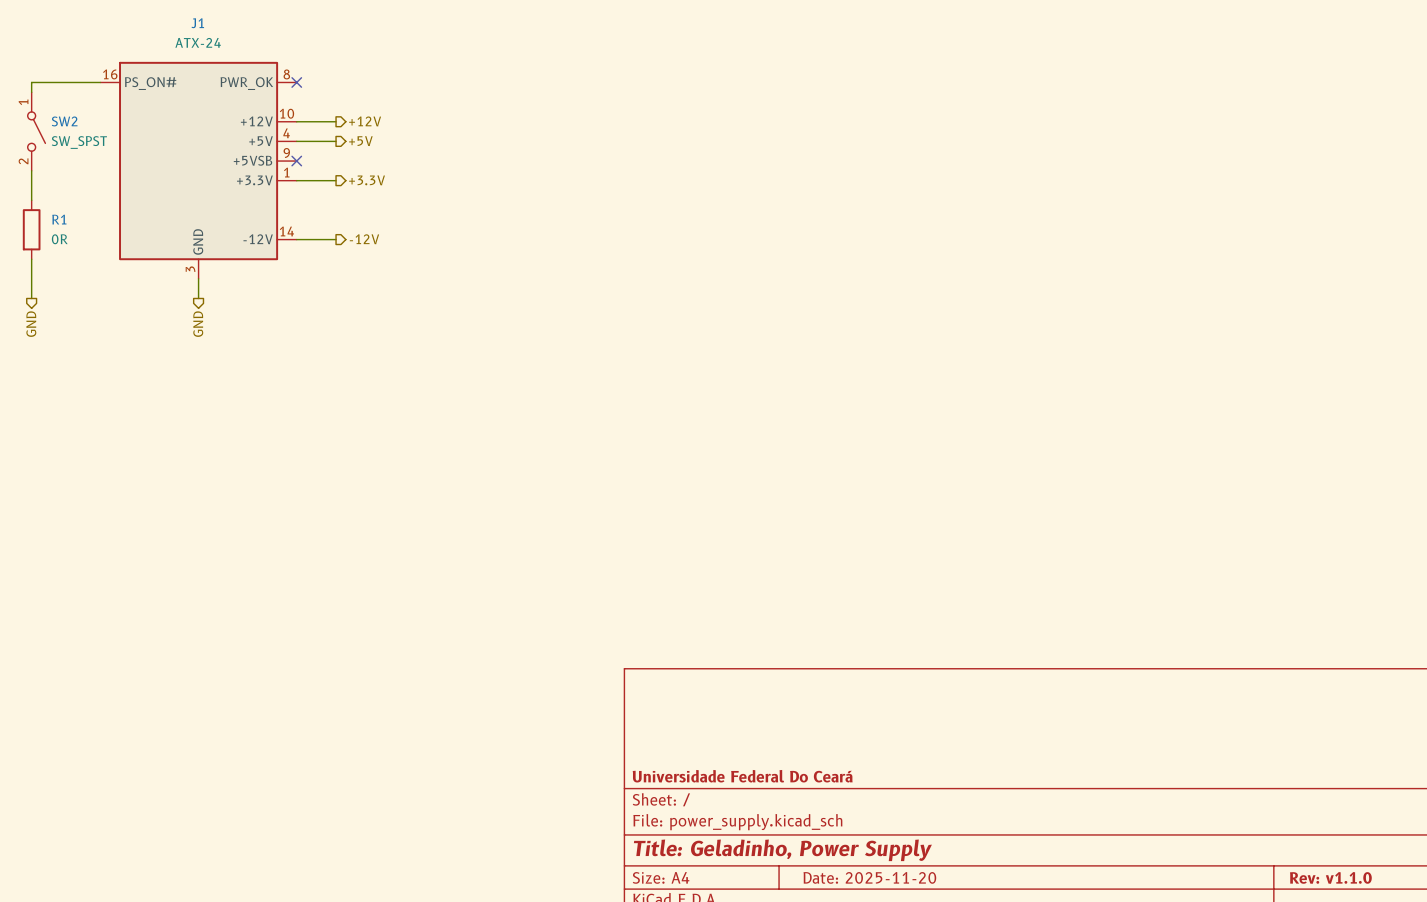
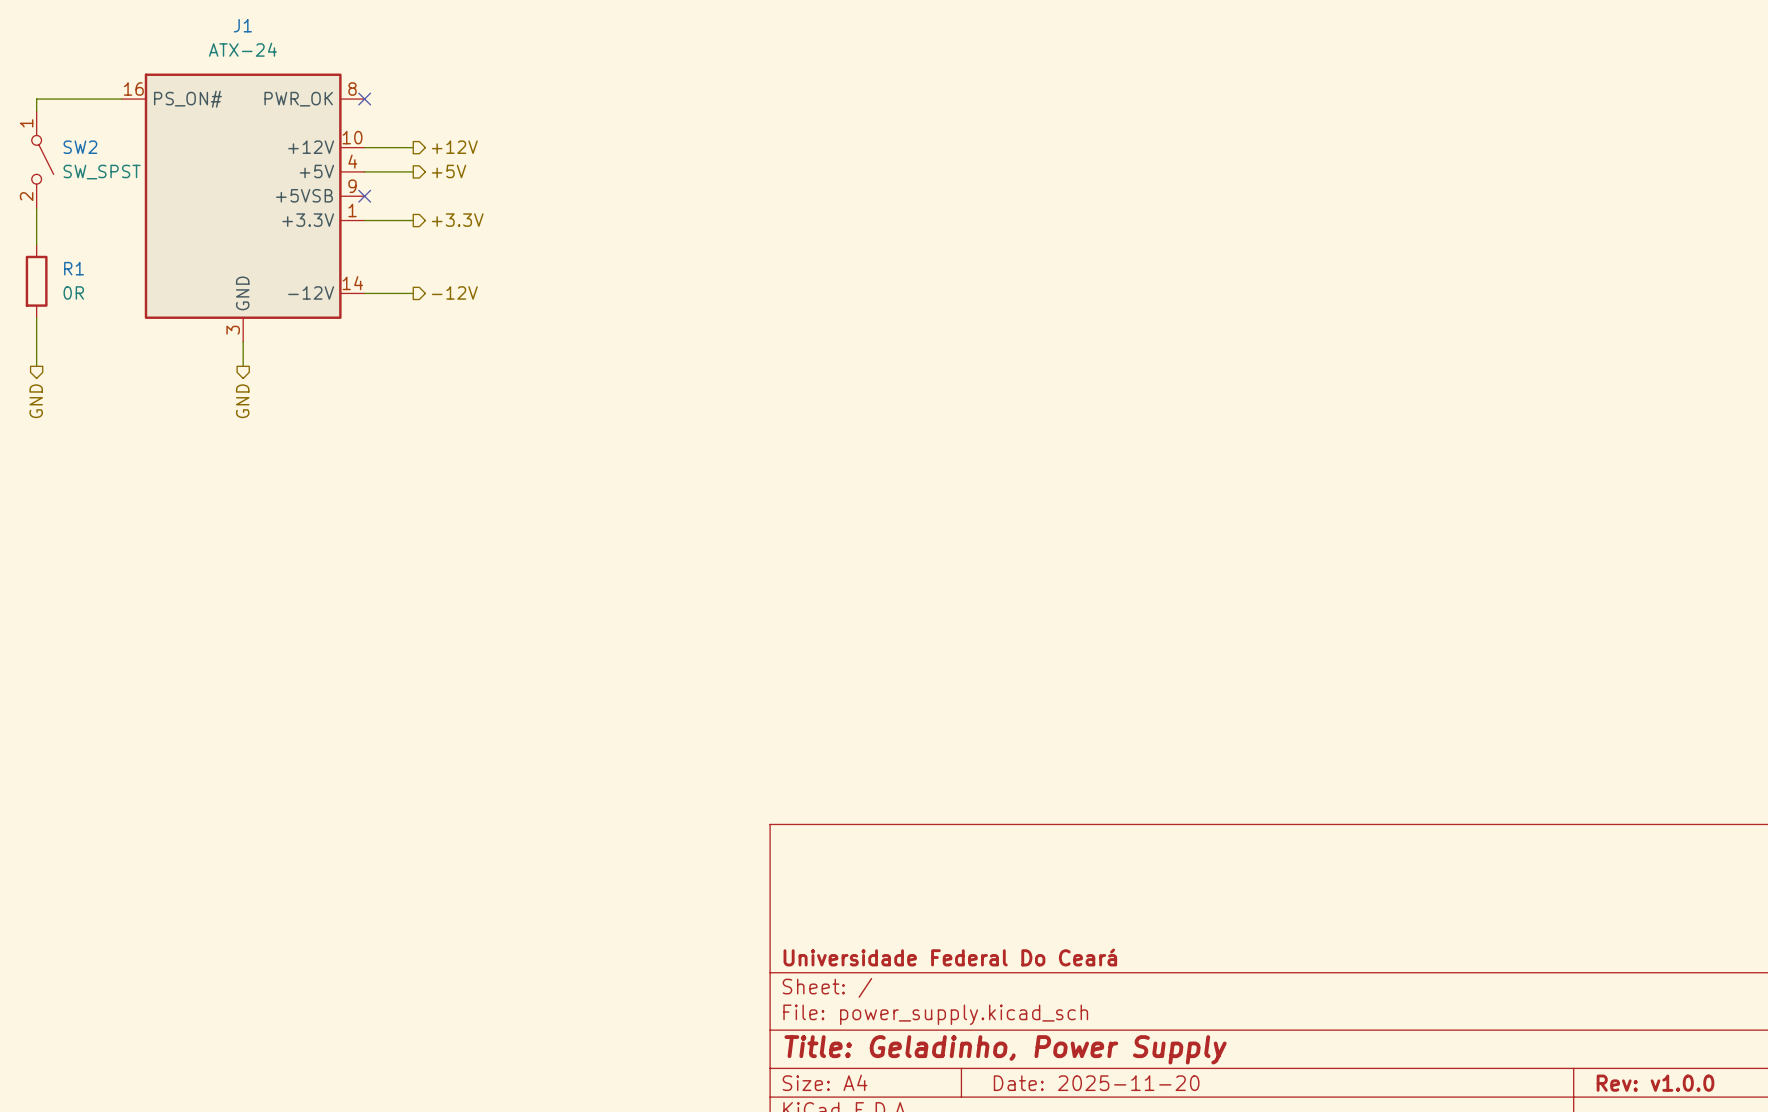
title block: Rev: v1.1.0 (1330, 877) -> Rev: v1.0.0 (1655, 1083)

